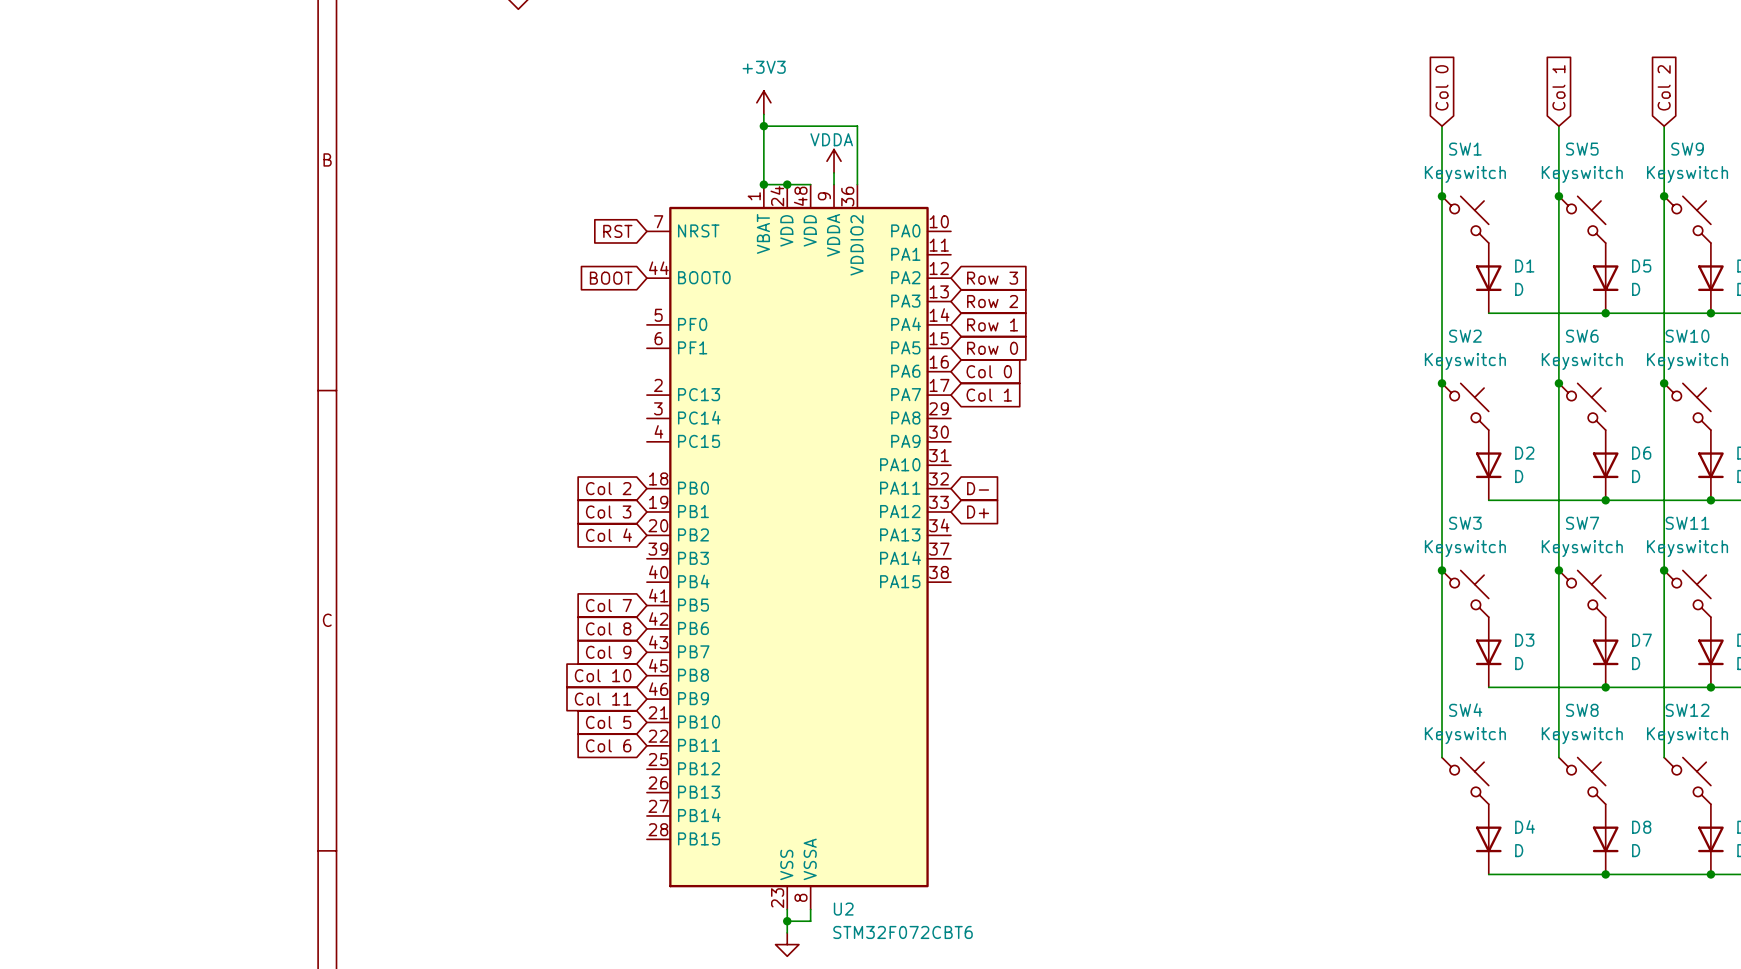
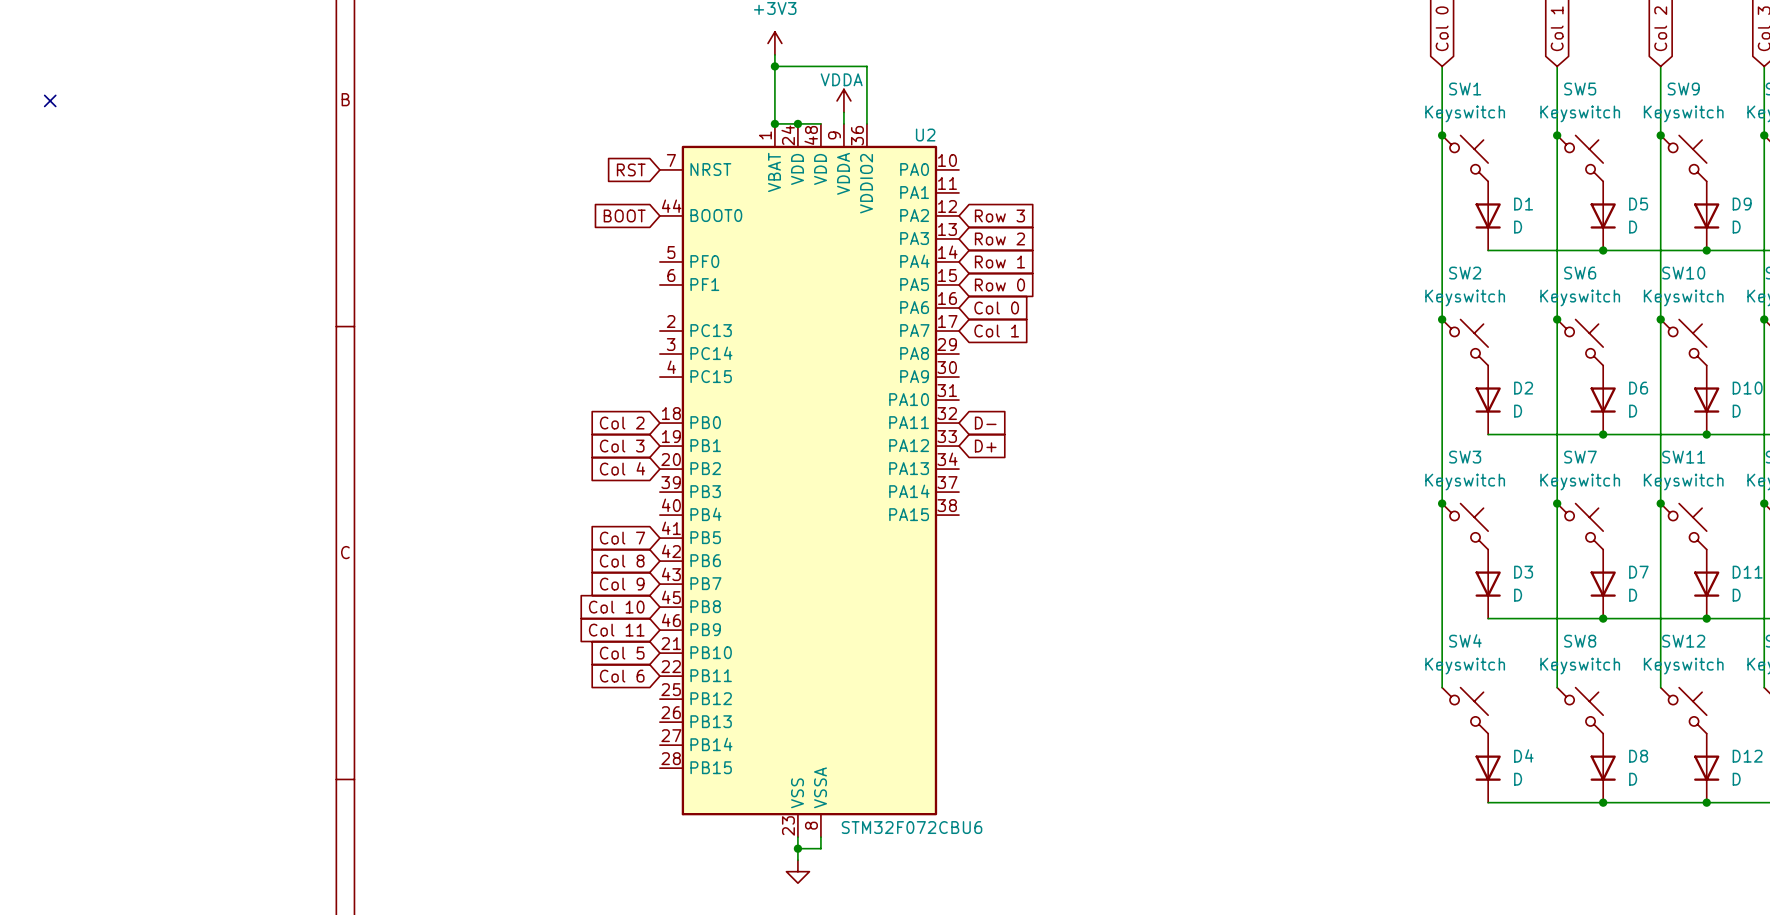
no-connect mark: none -> (50, 100)
U2 name position: U2 (843, 909) -> U2 (925, 135)
U2 value: STM32F072CBT6 (903, 932) -> STM32F072CBU6 (912, 827)

